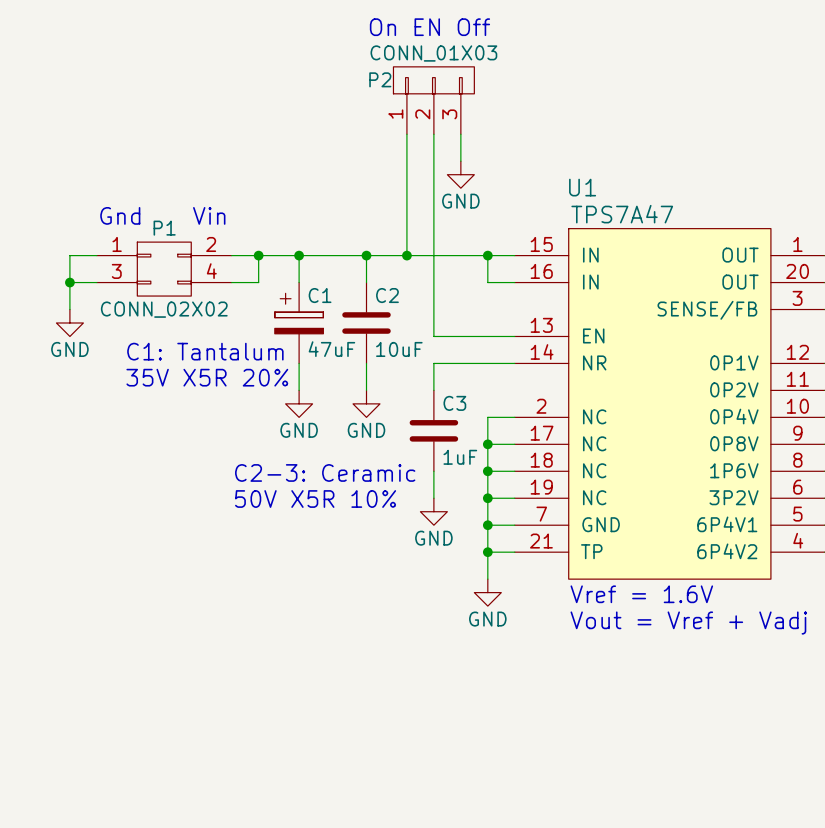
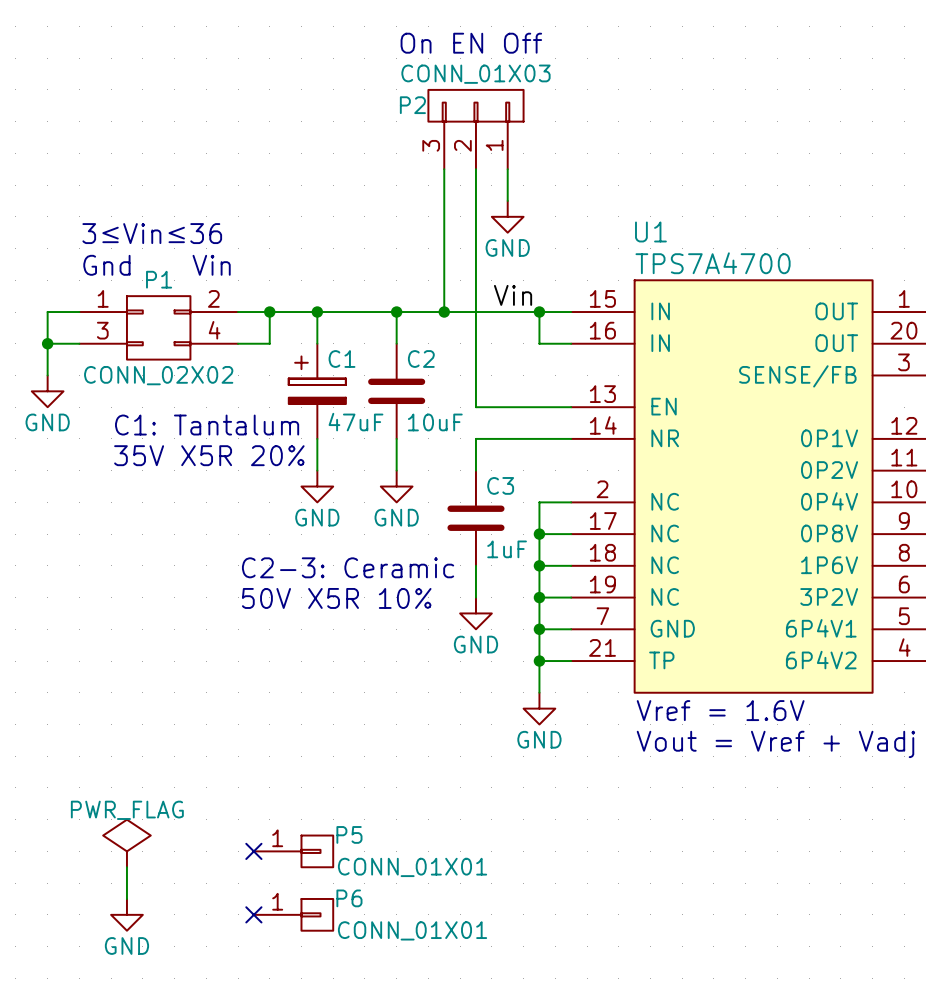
P2 flip: as is (433, 80) -> left-right (475, 105)
text: none -> 3≤Vin≤36 (152, 233)
U1 value: TPS7A47 (622, 214) -> TPS7A4700 (713, 263)
label: none -> Vin (513, 295)
power symbol: none -> PWR_FLAG (126, 843)
no-connect mark: none -> (253, 851)
P5: none -> CONN_01X01 (293, 851)
wire: none -> (126, 867) (126, 898)
power symbol: none -> GND (126, 914)
no-connect mark: none -> (253, 914)
P6: none -> CONN_01X01 (293, 914)

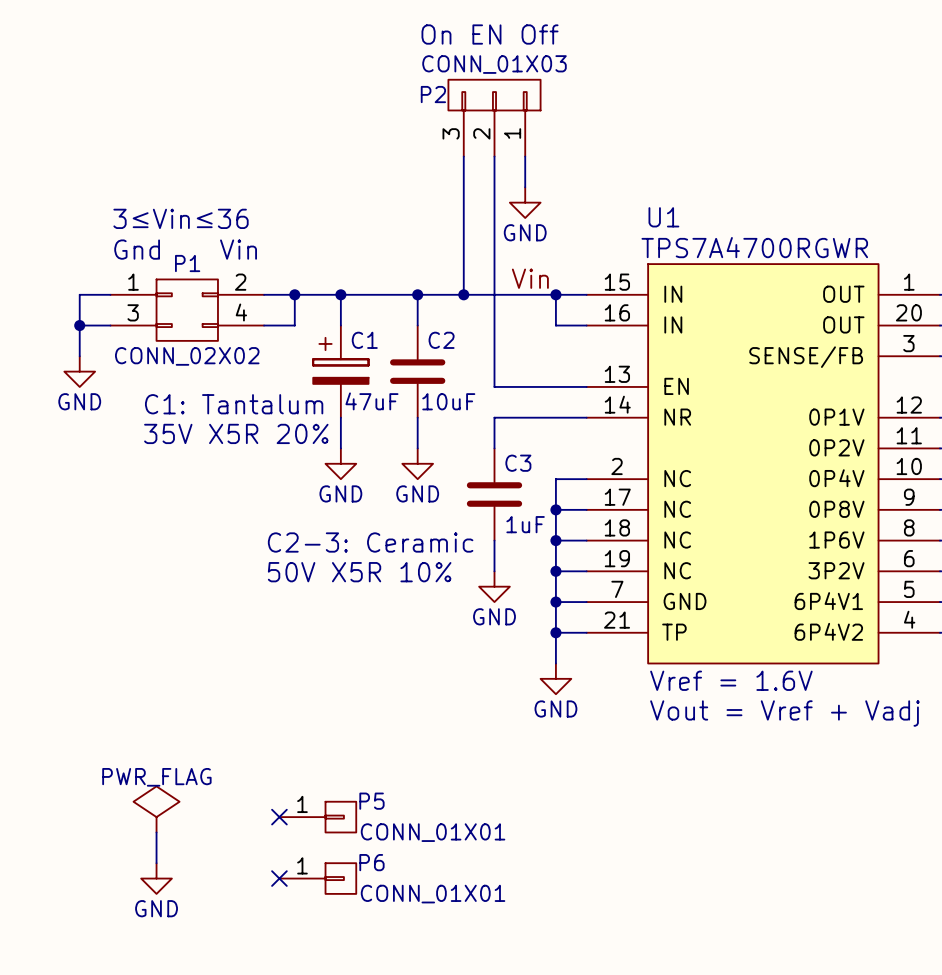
U1 value: TPS7A4700 (713, 263) -> TPS7A4700RGWR (754, 247)
C1 text: none -> 47uF (371, 401)
C1 value: 47uF (355, 422) -> none
C2 text: none -> 10uF (448, 401)
C2 value: 10uF (435, 422) -> none
C3 value: 1uF (507, 549) -> none
C3 text: none -> 1uF (525, 524)

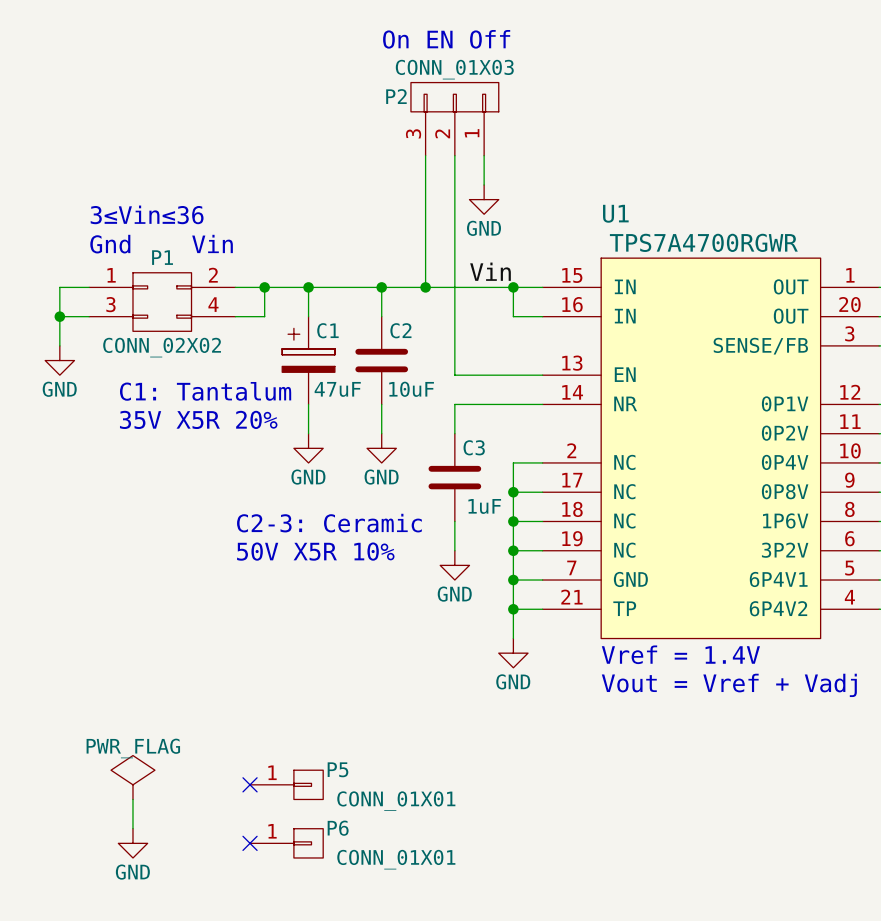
text: Vref = 1.6V (731, 680) -> Vref = 1.4V (680, 654)

